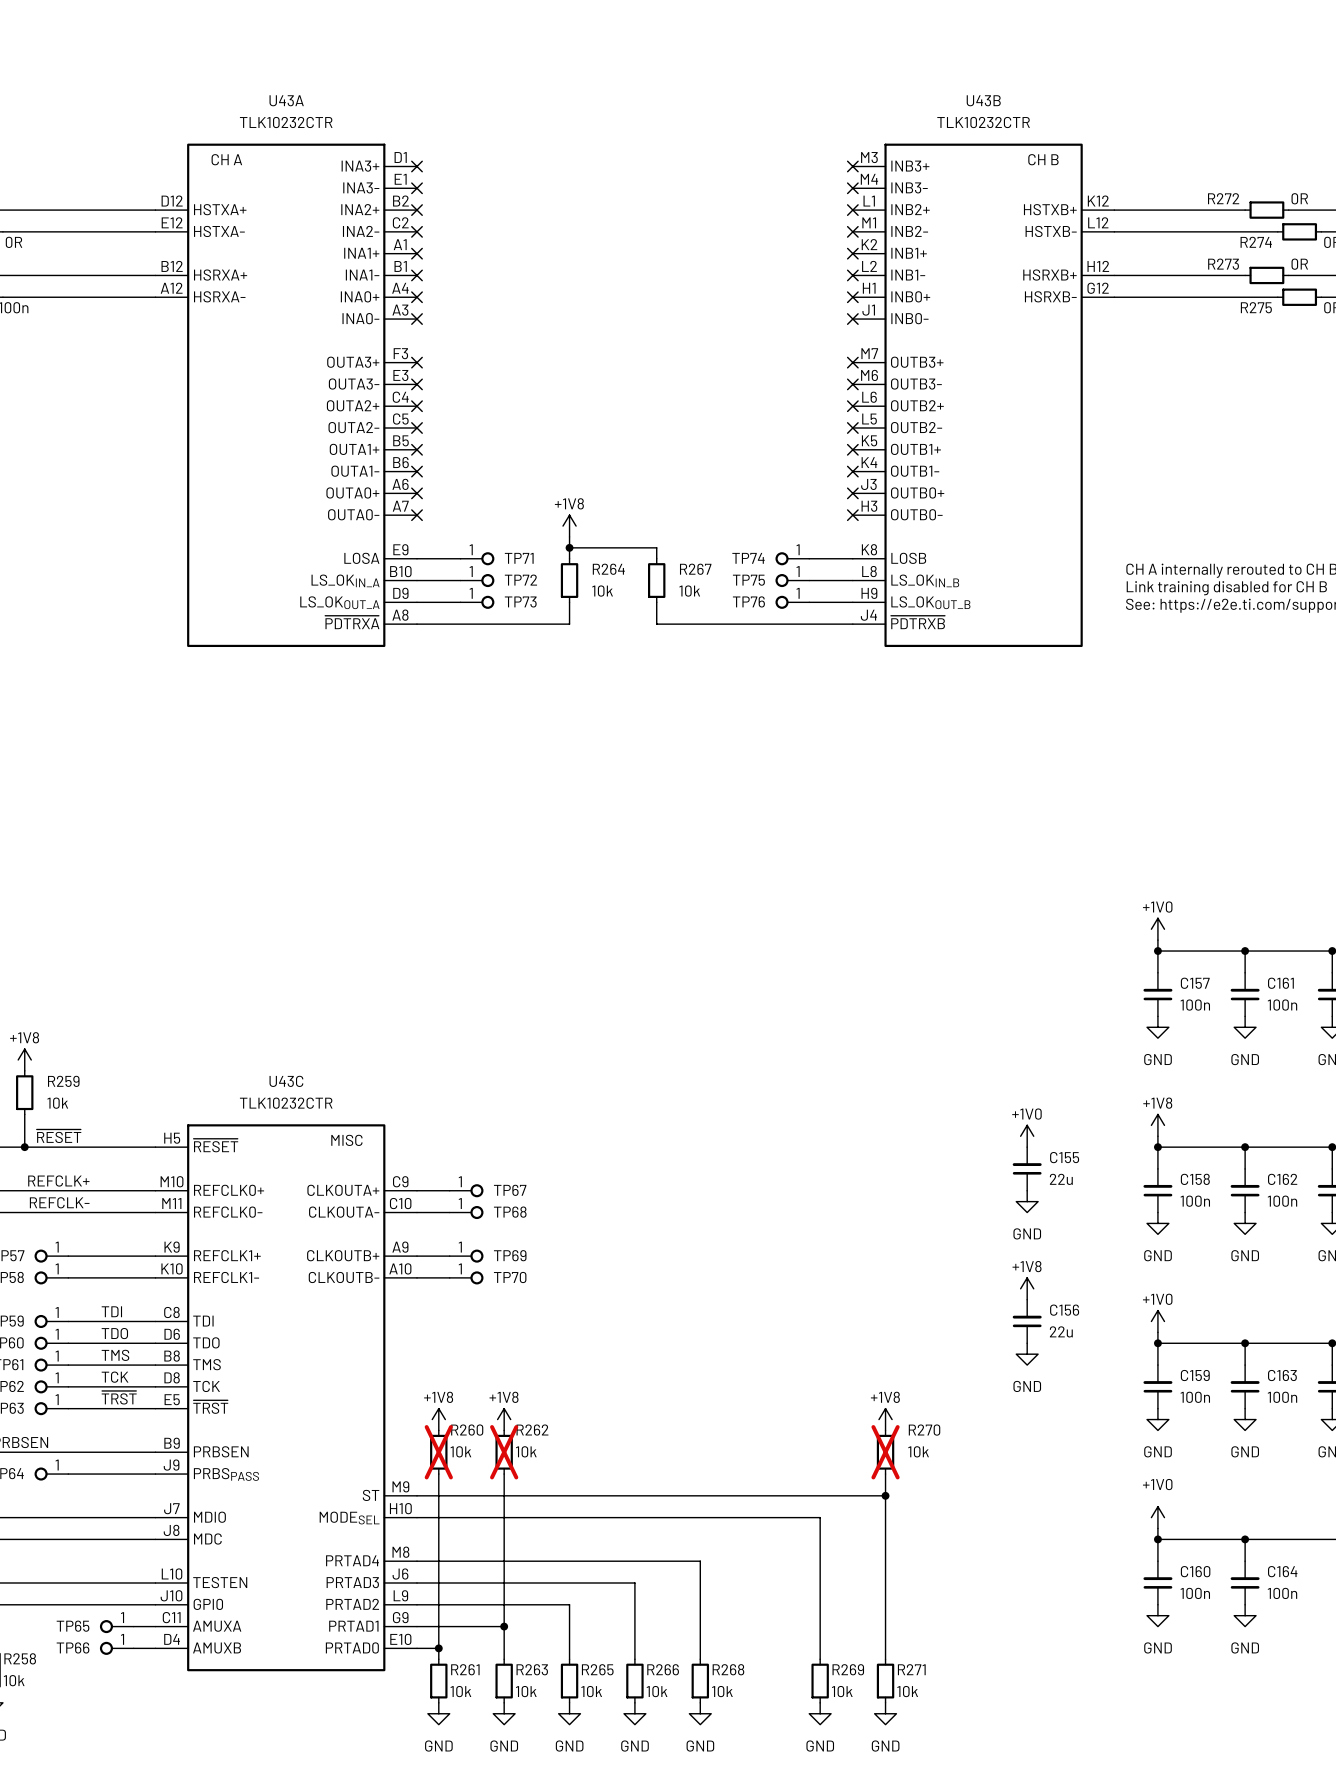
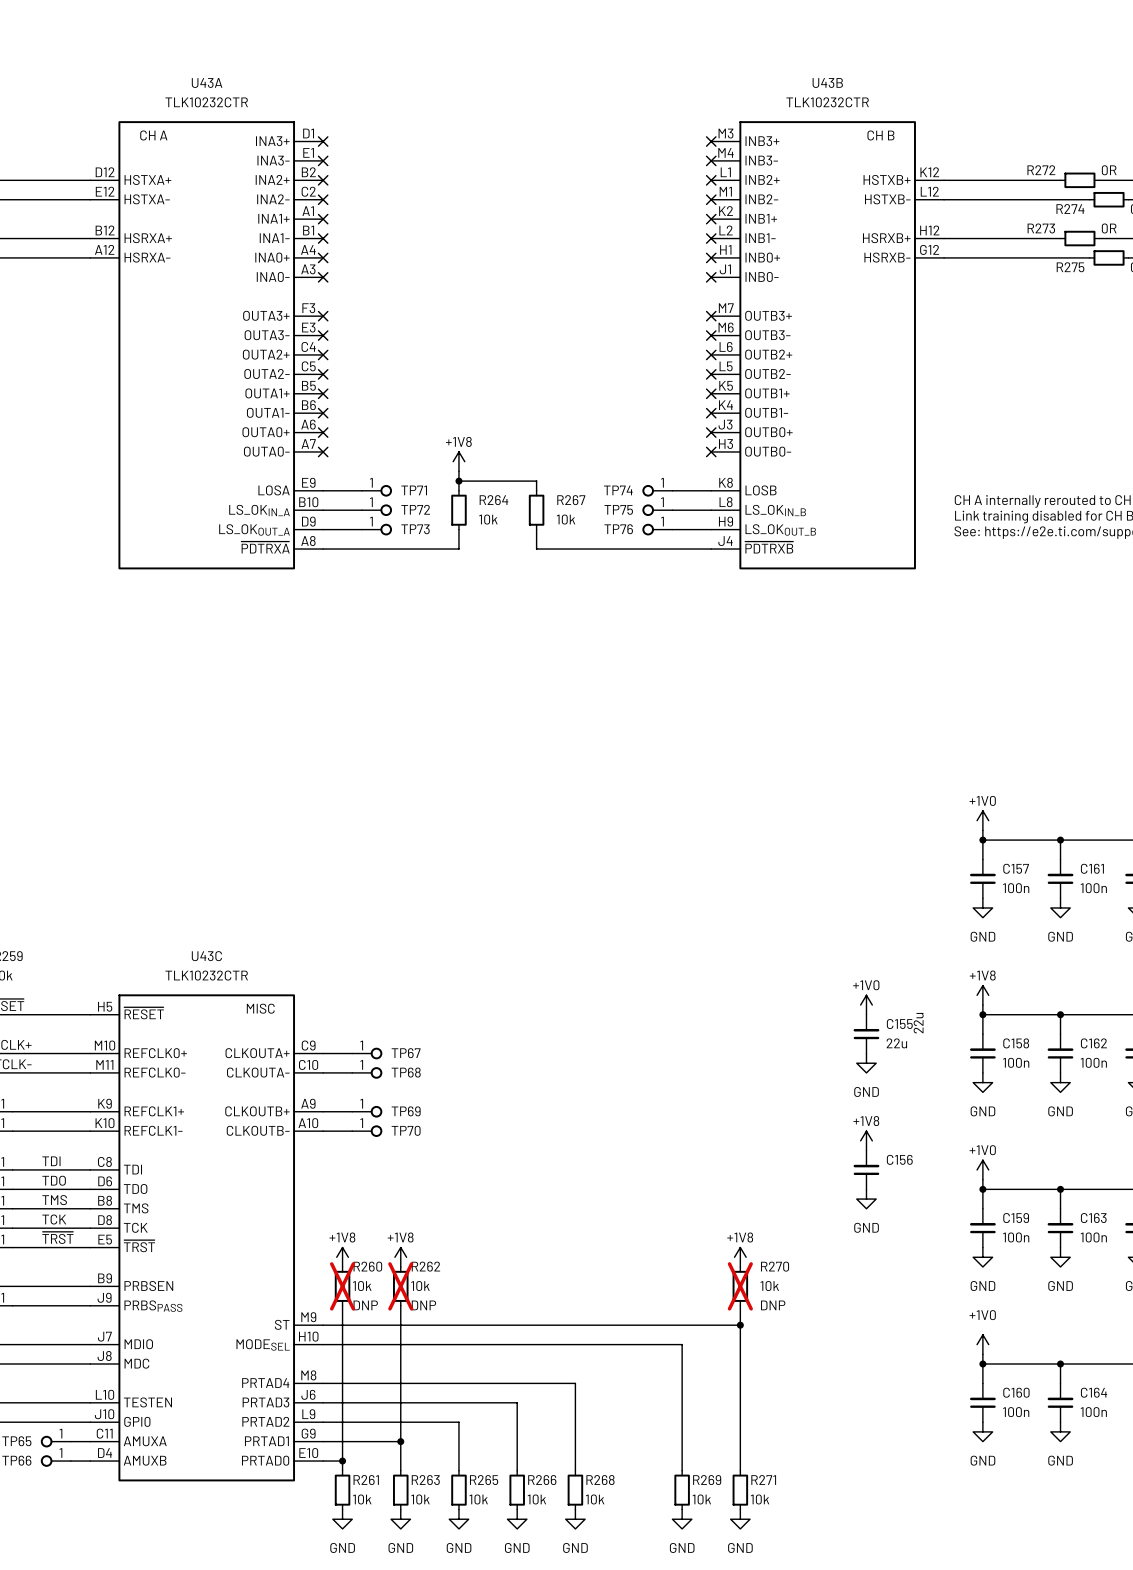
C156 text rotation: 0° (1061, 1331) -> 90° counterclockwise (918, 1023)
C156 text position: 22u (1061, 1331) -> 22u (918, 1023)
R260 text: none -> DNP (365, 1305)
R262 text: none -> DNP (423, 1305)
R270 text: none -> DNP (773, 1305)

